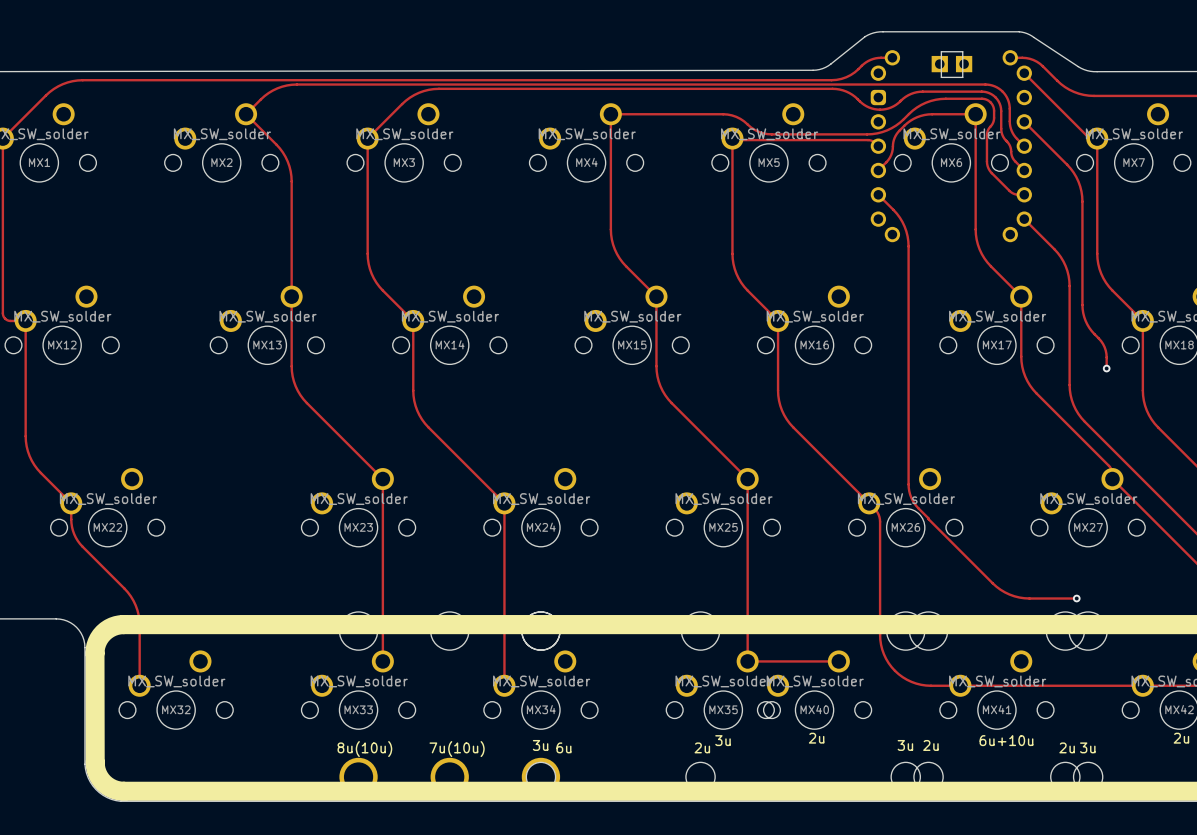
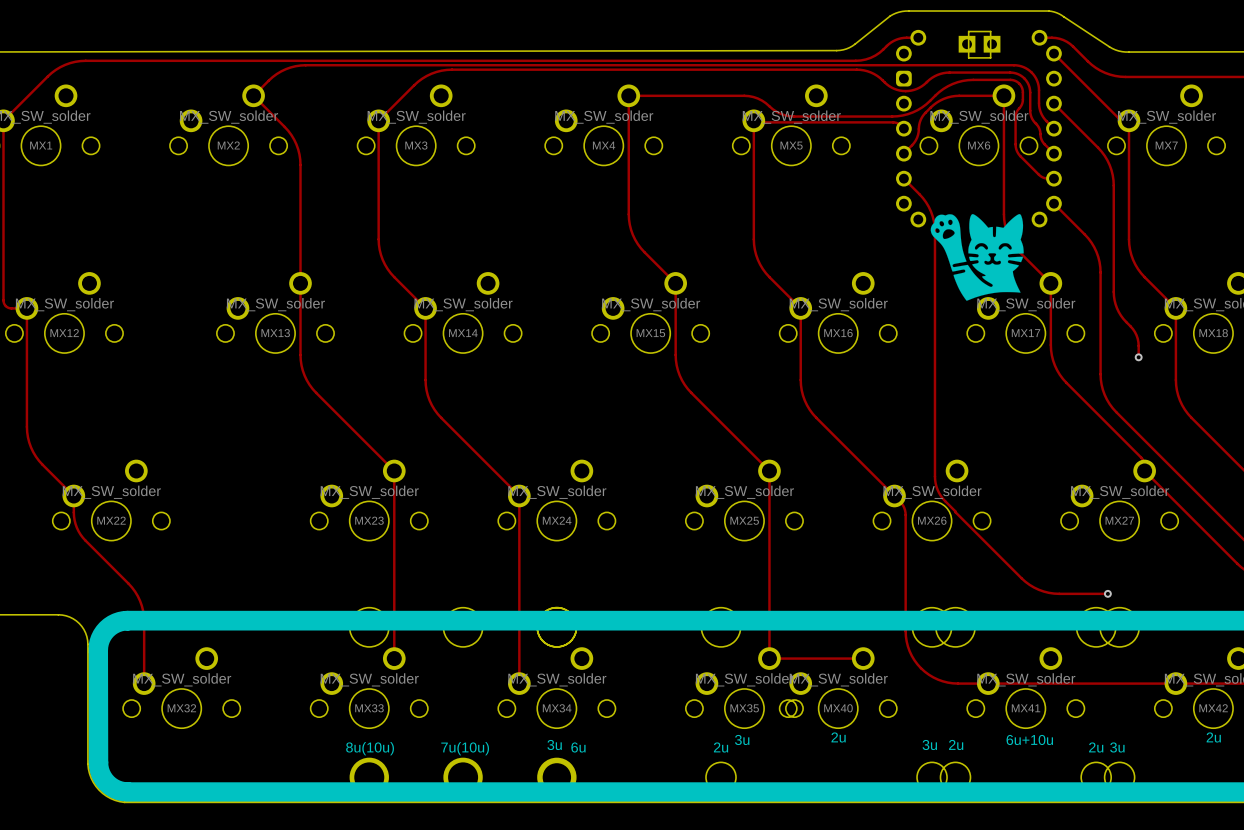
drawing: none -> [930, 214, 1024, 301]

